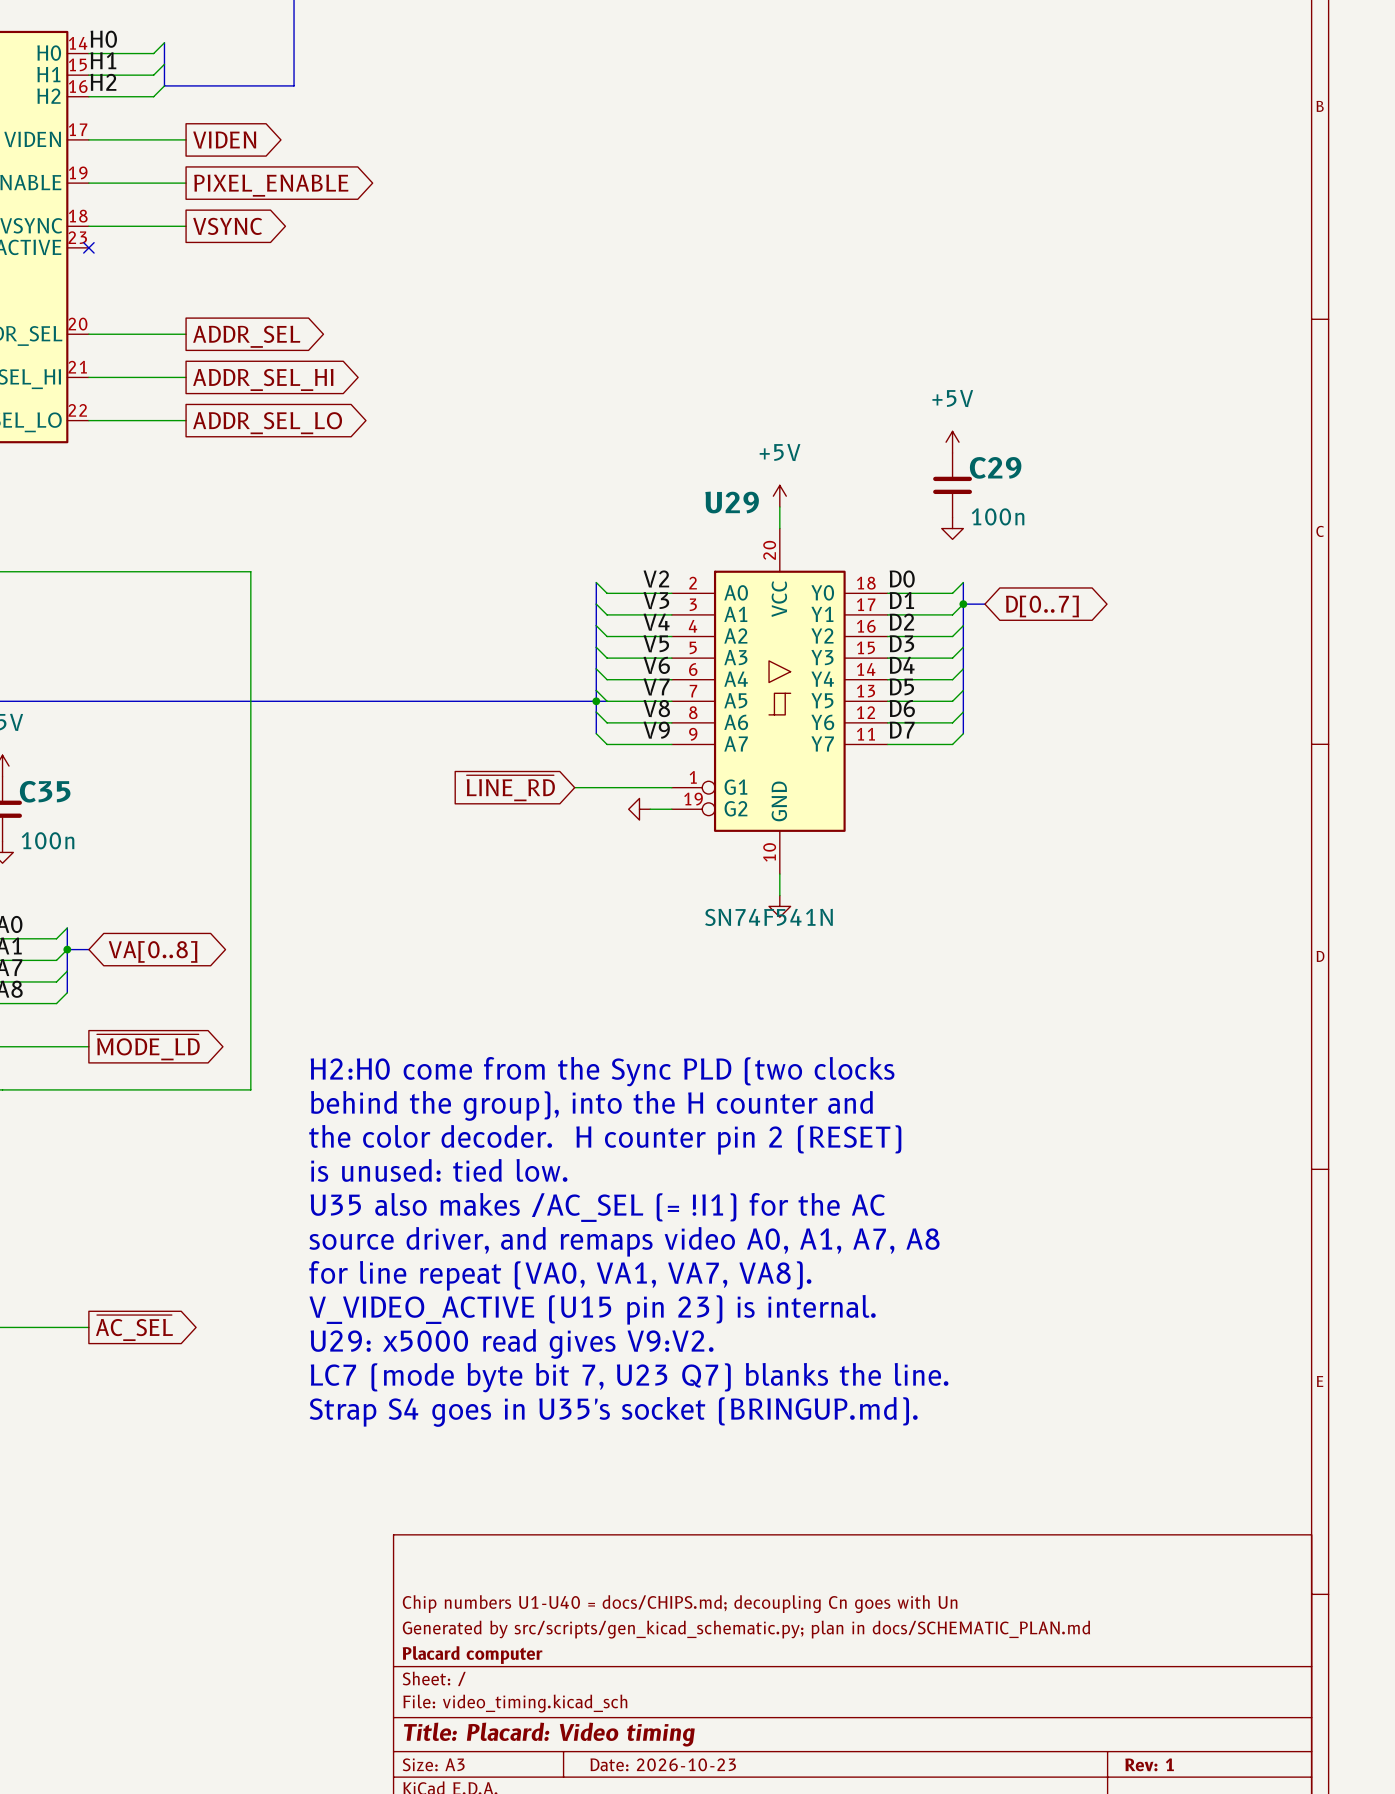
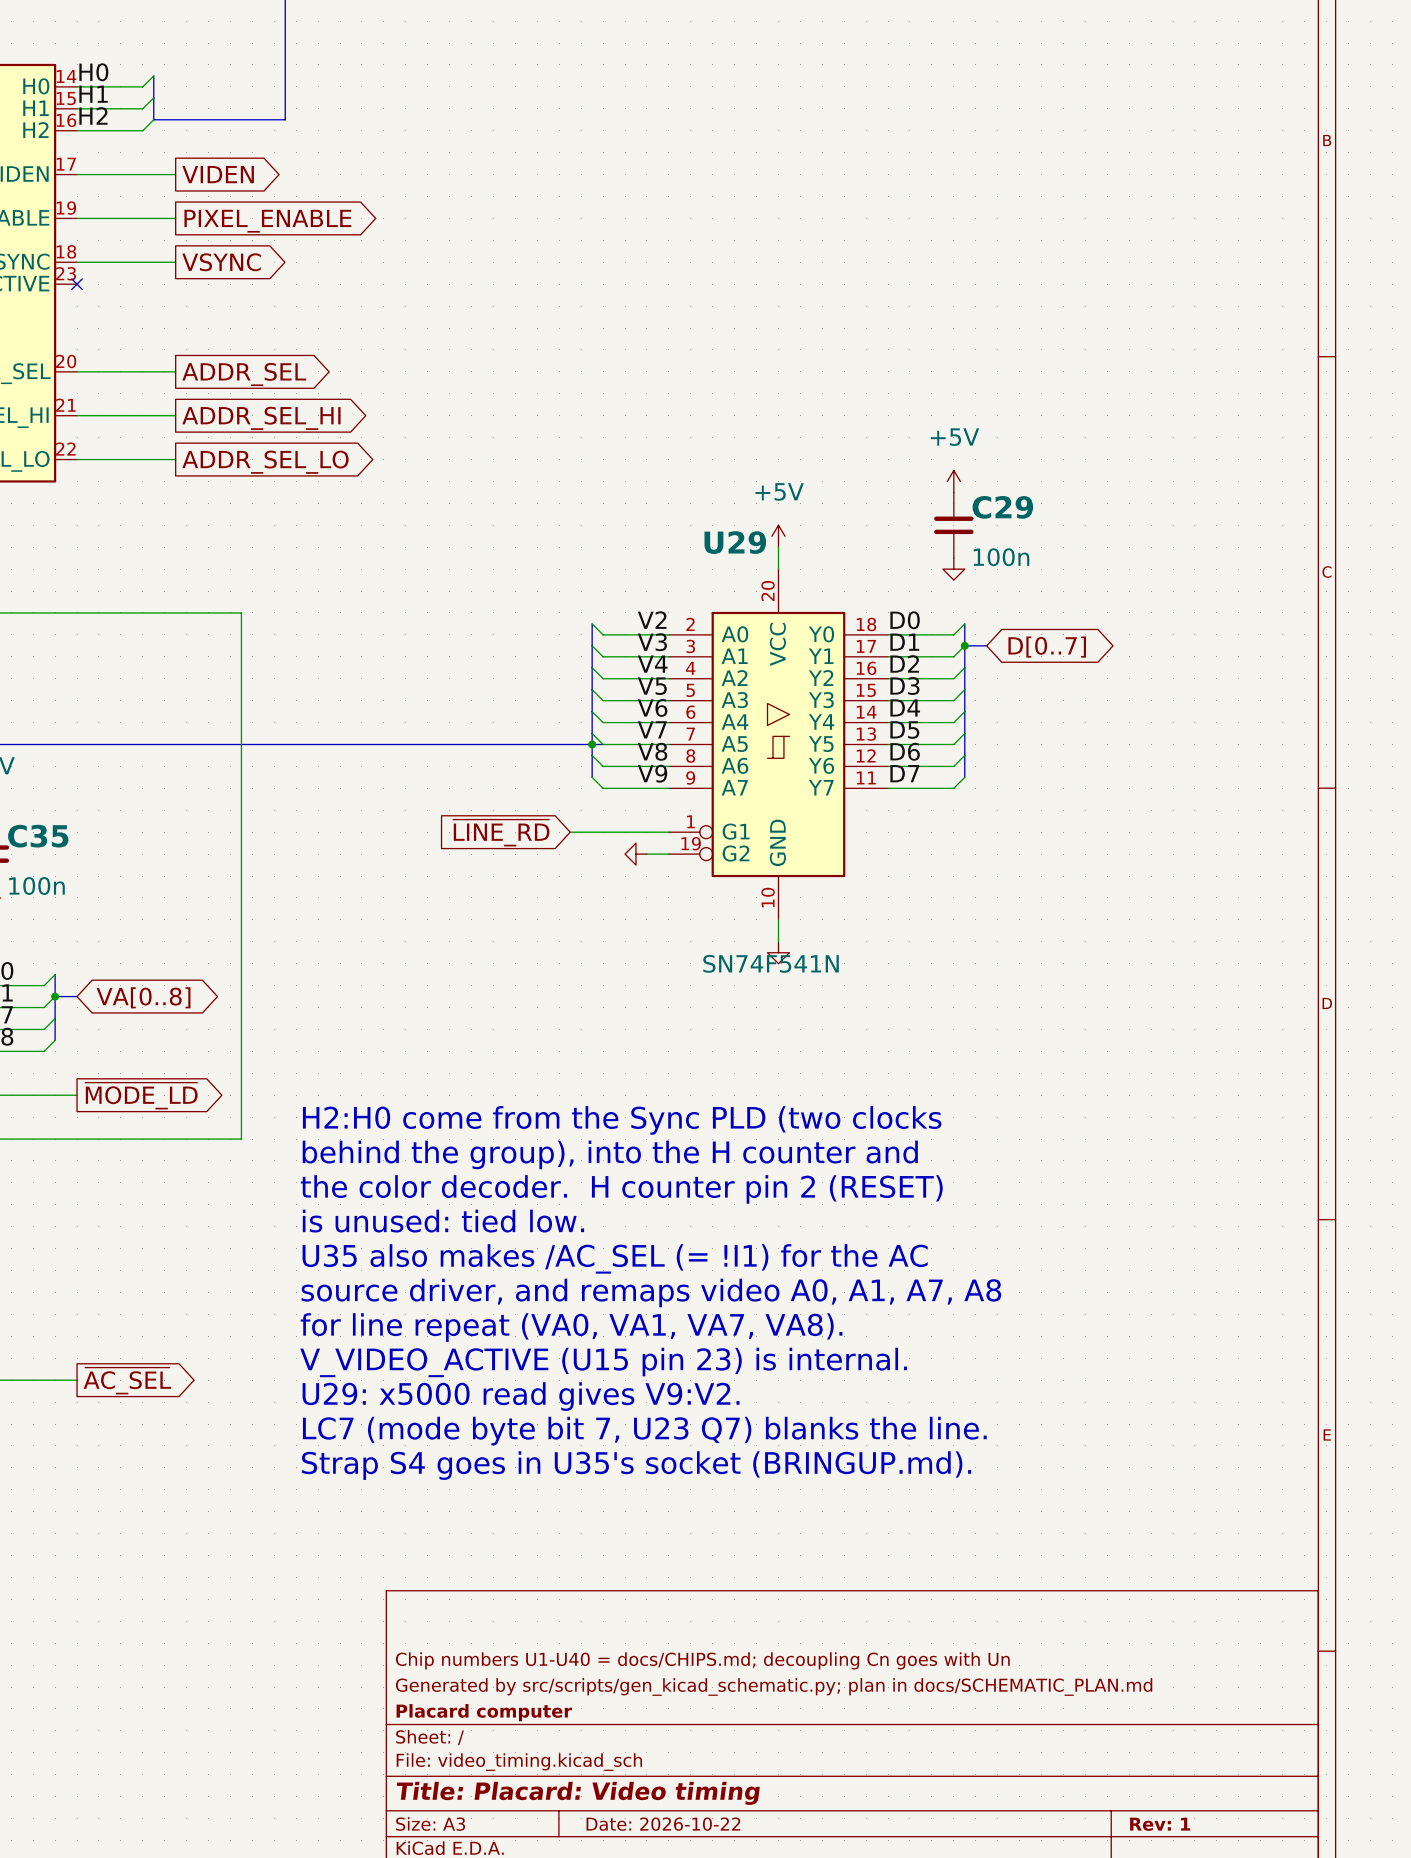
title block: Date: 2026-10-23 (663, 1764) -> Date: 2026-10-22 (663, 1824)

